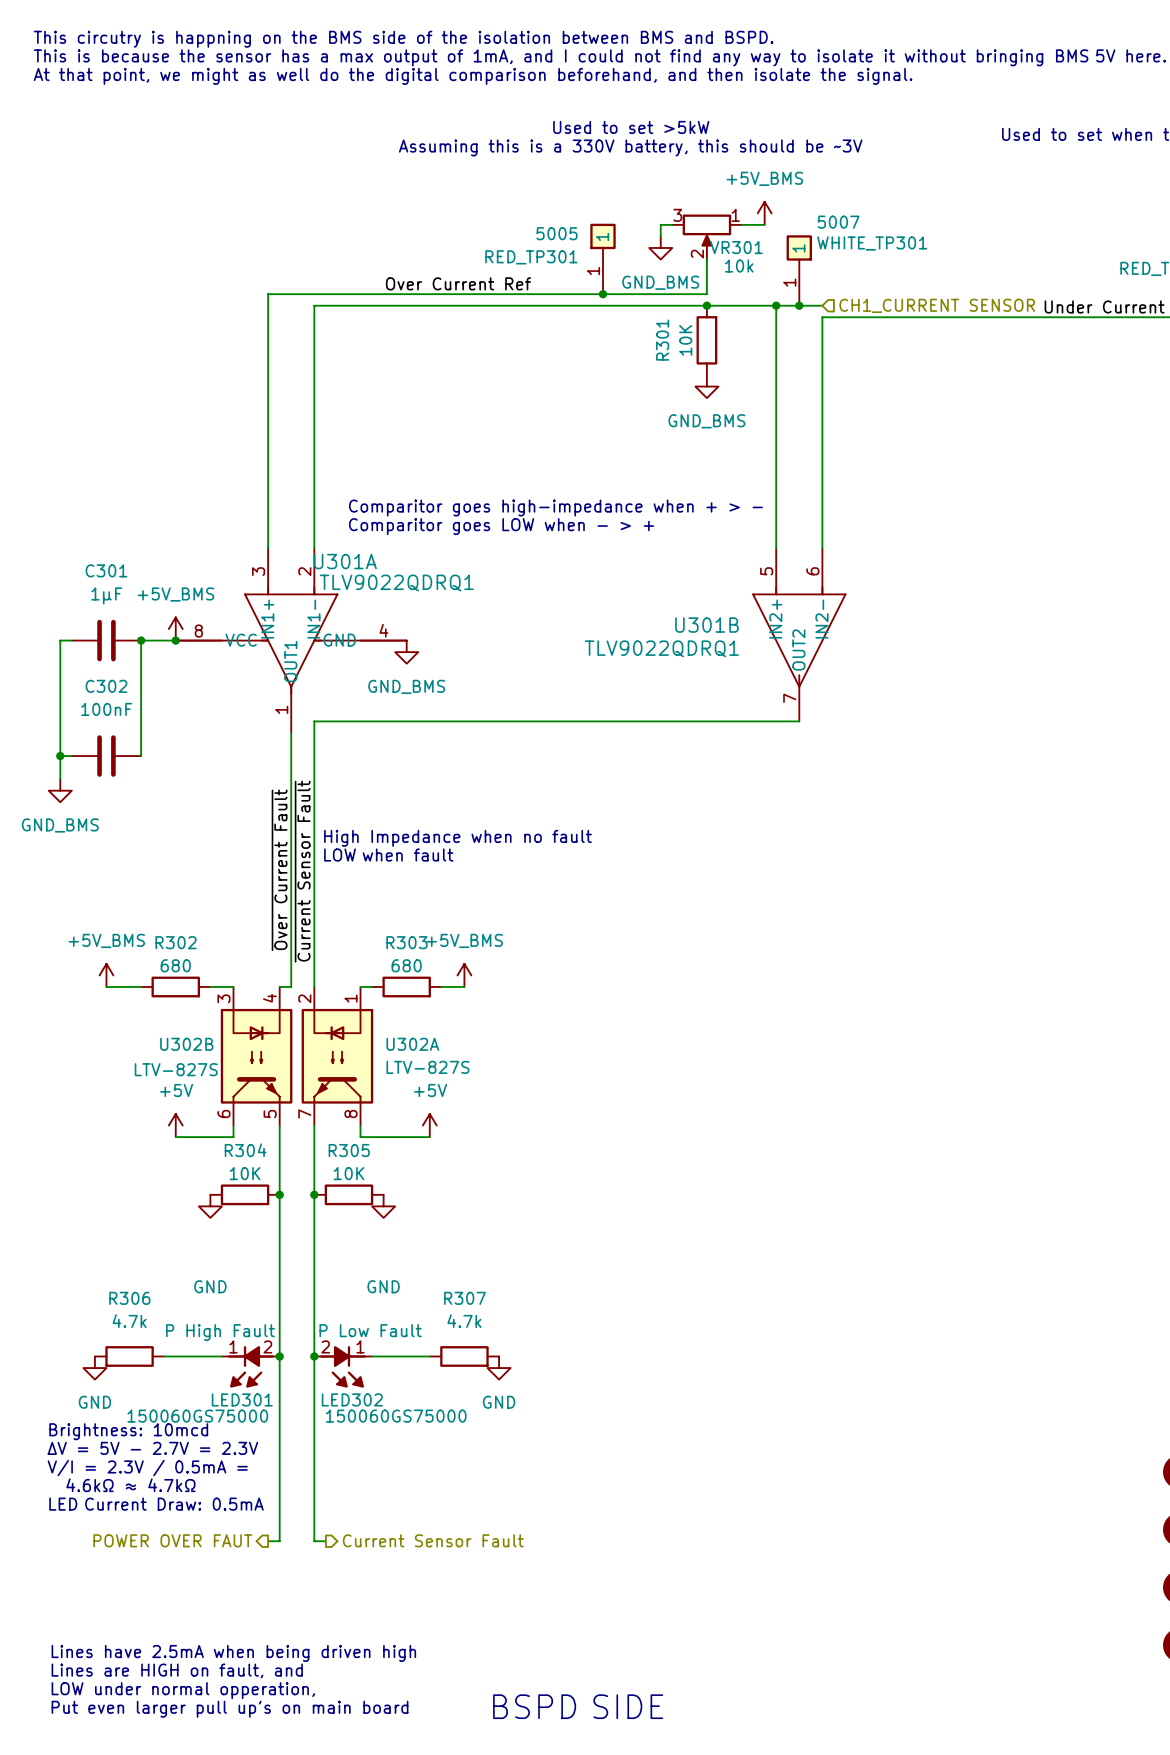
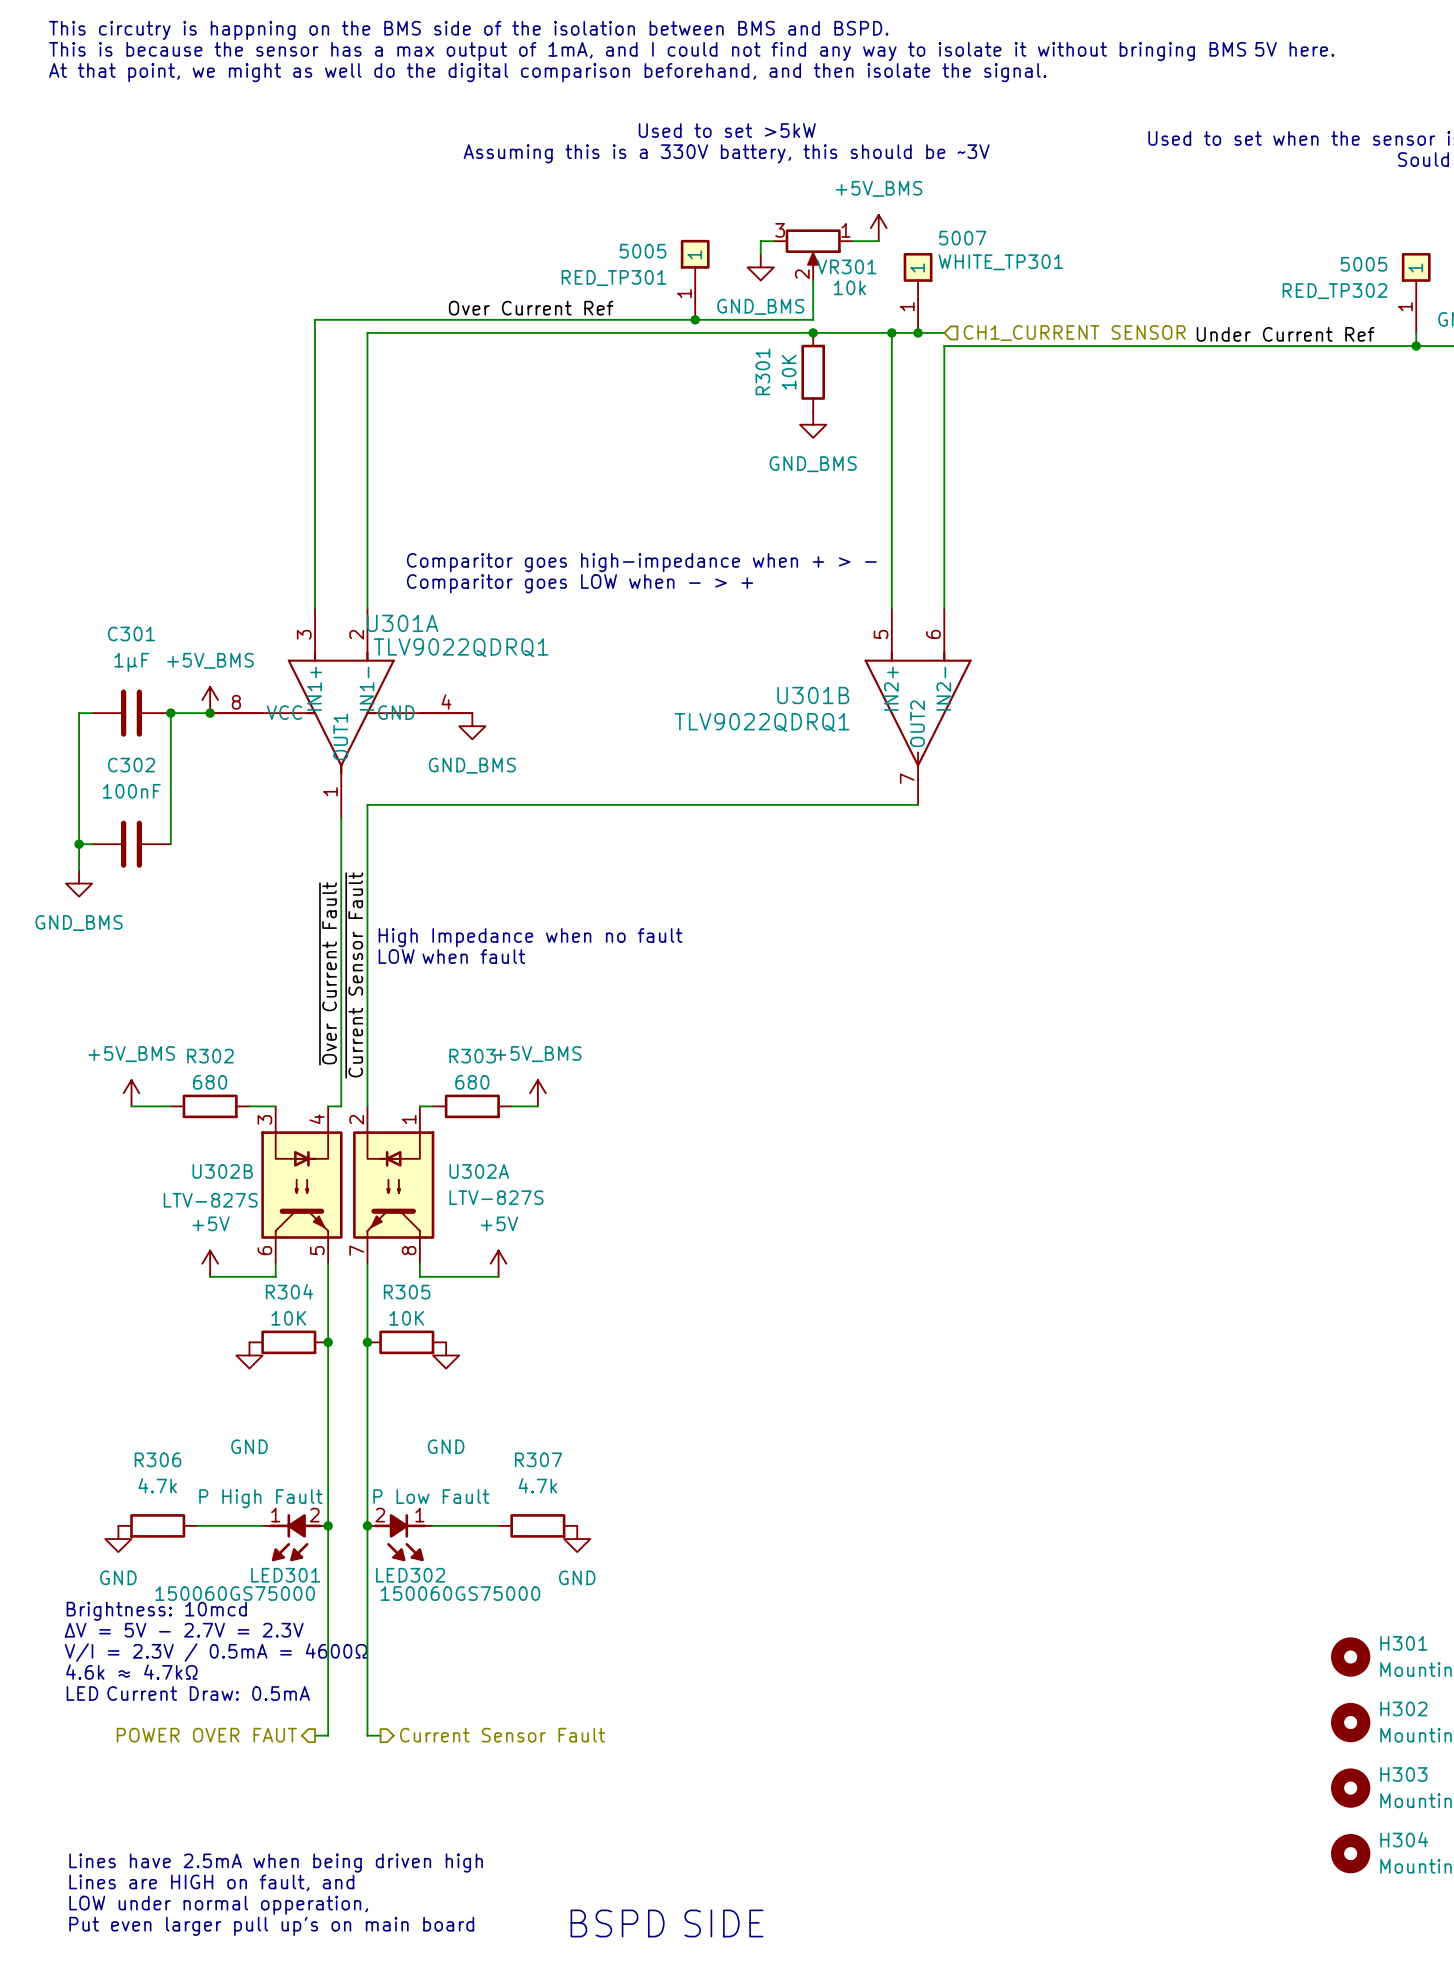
text: V/I = 2.3V / 0.5mA = (147, 1468) -> V/I = 2.3V / 0.5mA = 4600Ω (216, 1652)
text: 4.6kΩ ≈ 4.7kΩ (130, 1485) -> 4.6k ≈ 4.7kΩ (131, 1672)

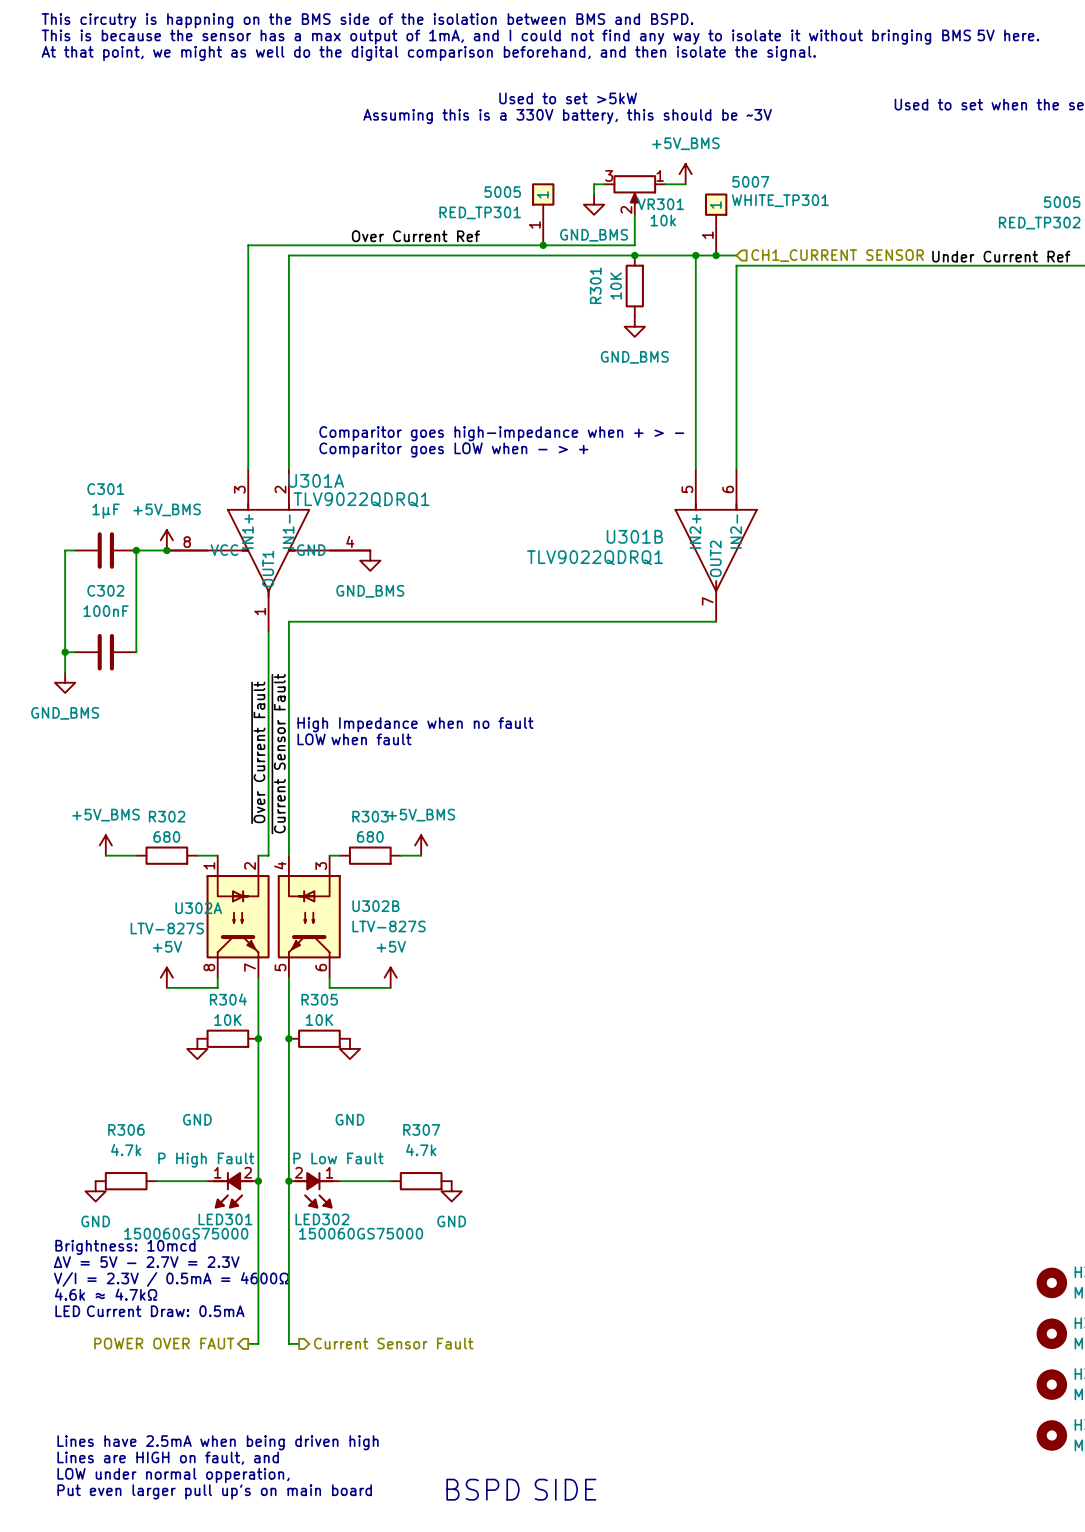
U302A name position: U302A (479, 1171) -> U302A (198, 908)
U302B flip: as is (301, 1185) -> left-right (309, 916)
U302A flip: as is (393, 1185) -> left-right (238, 916)

